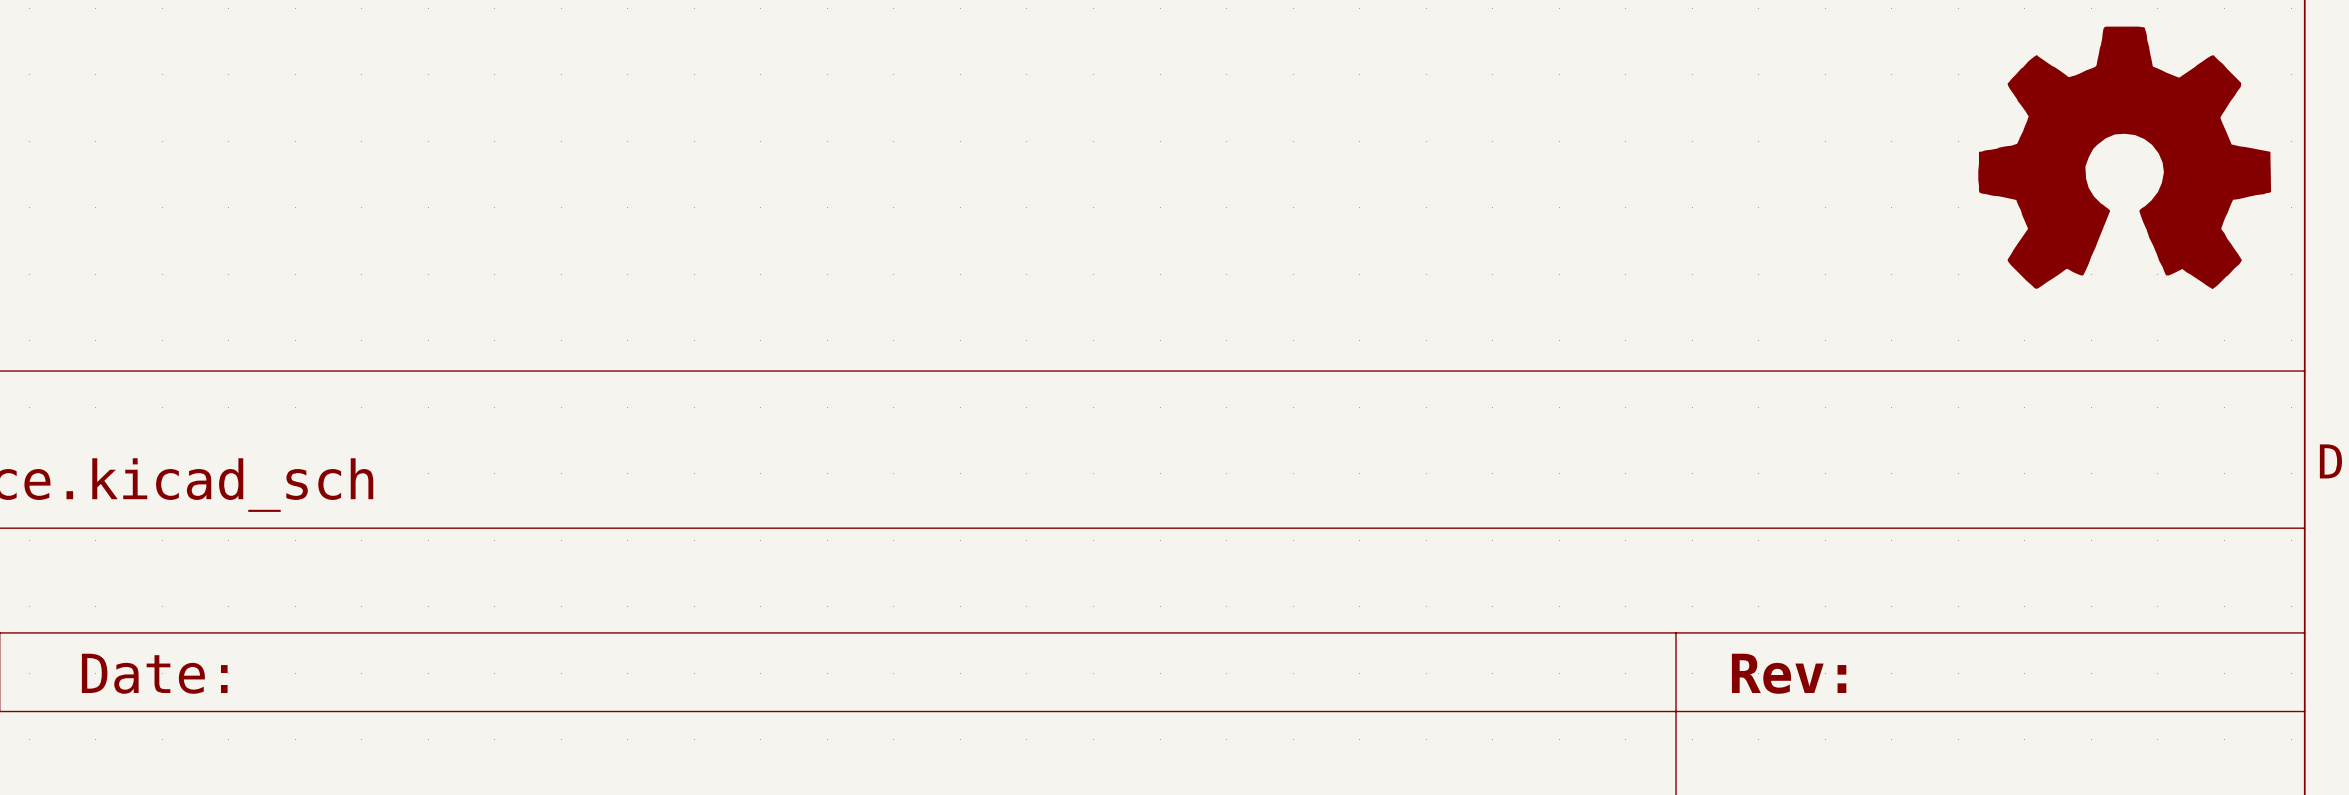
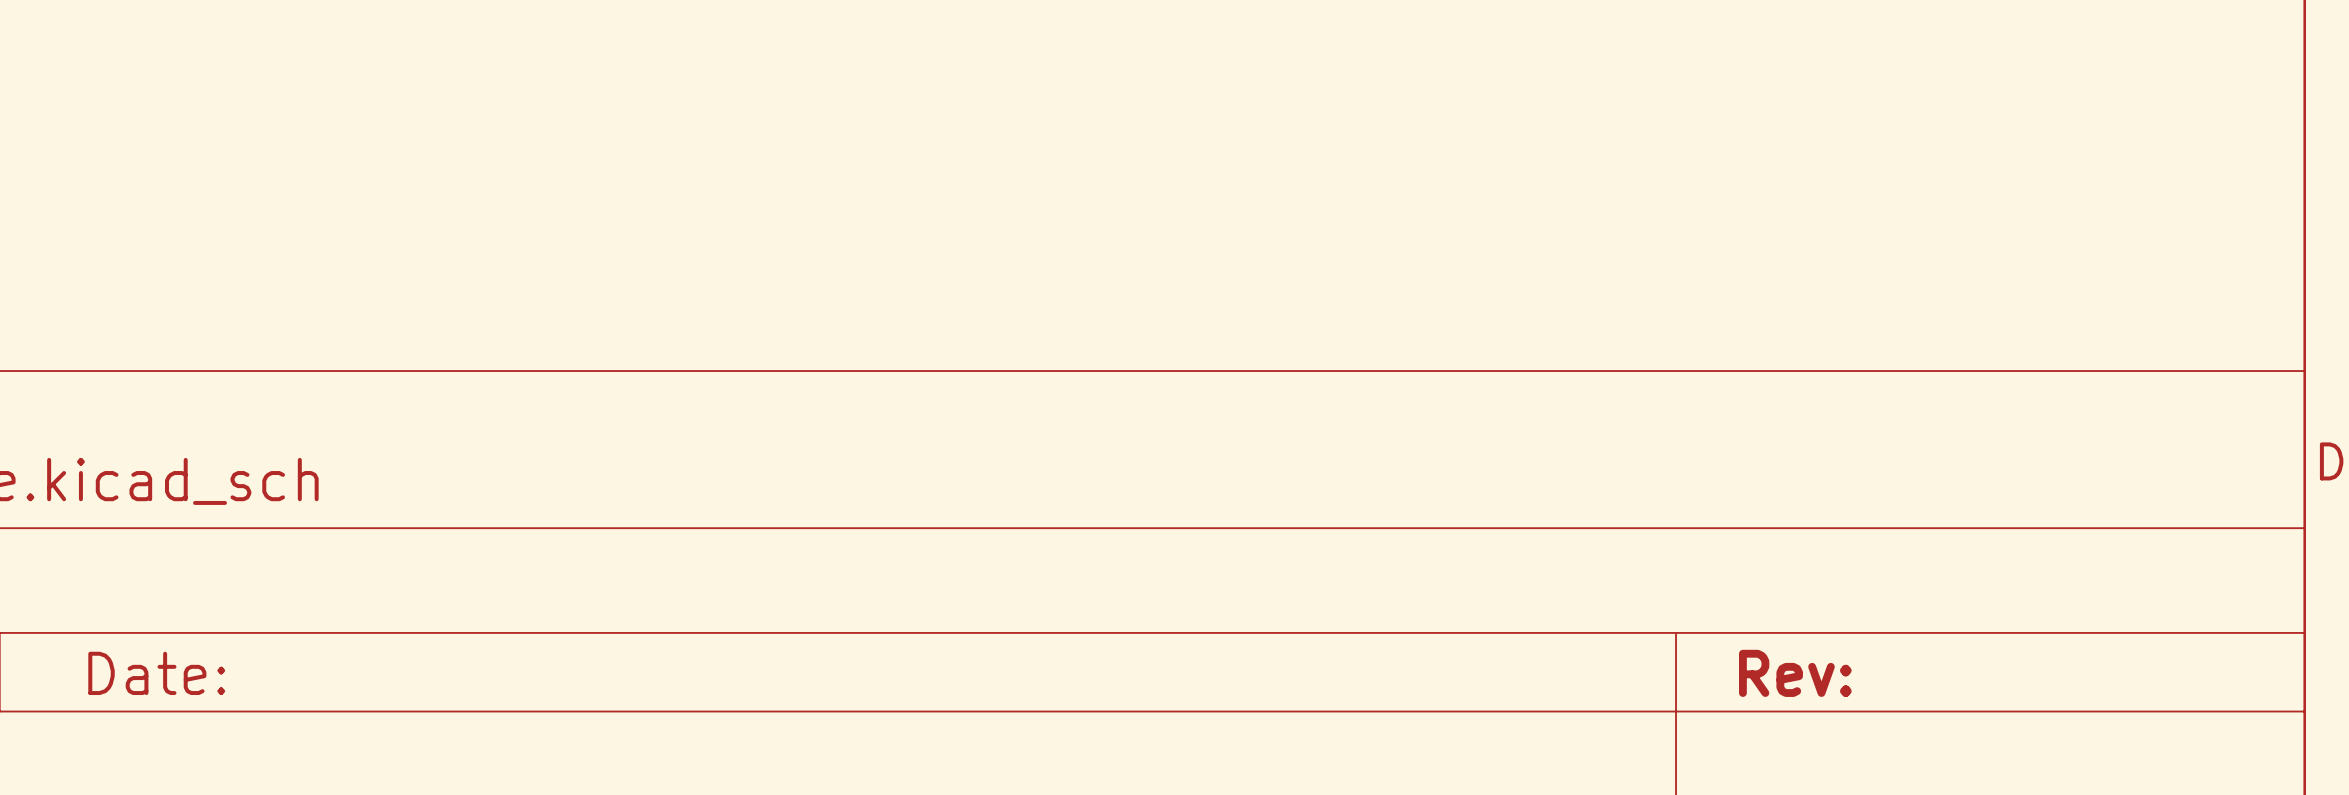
power symbol: (2124, 157) -> none

